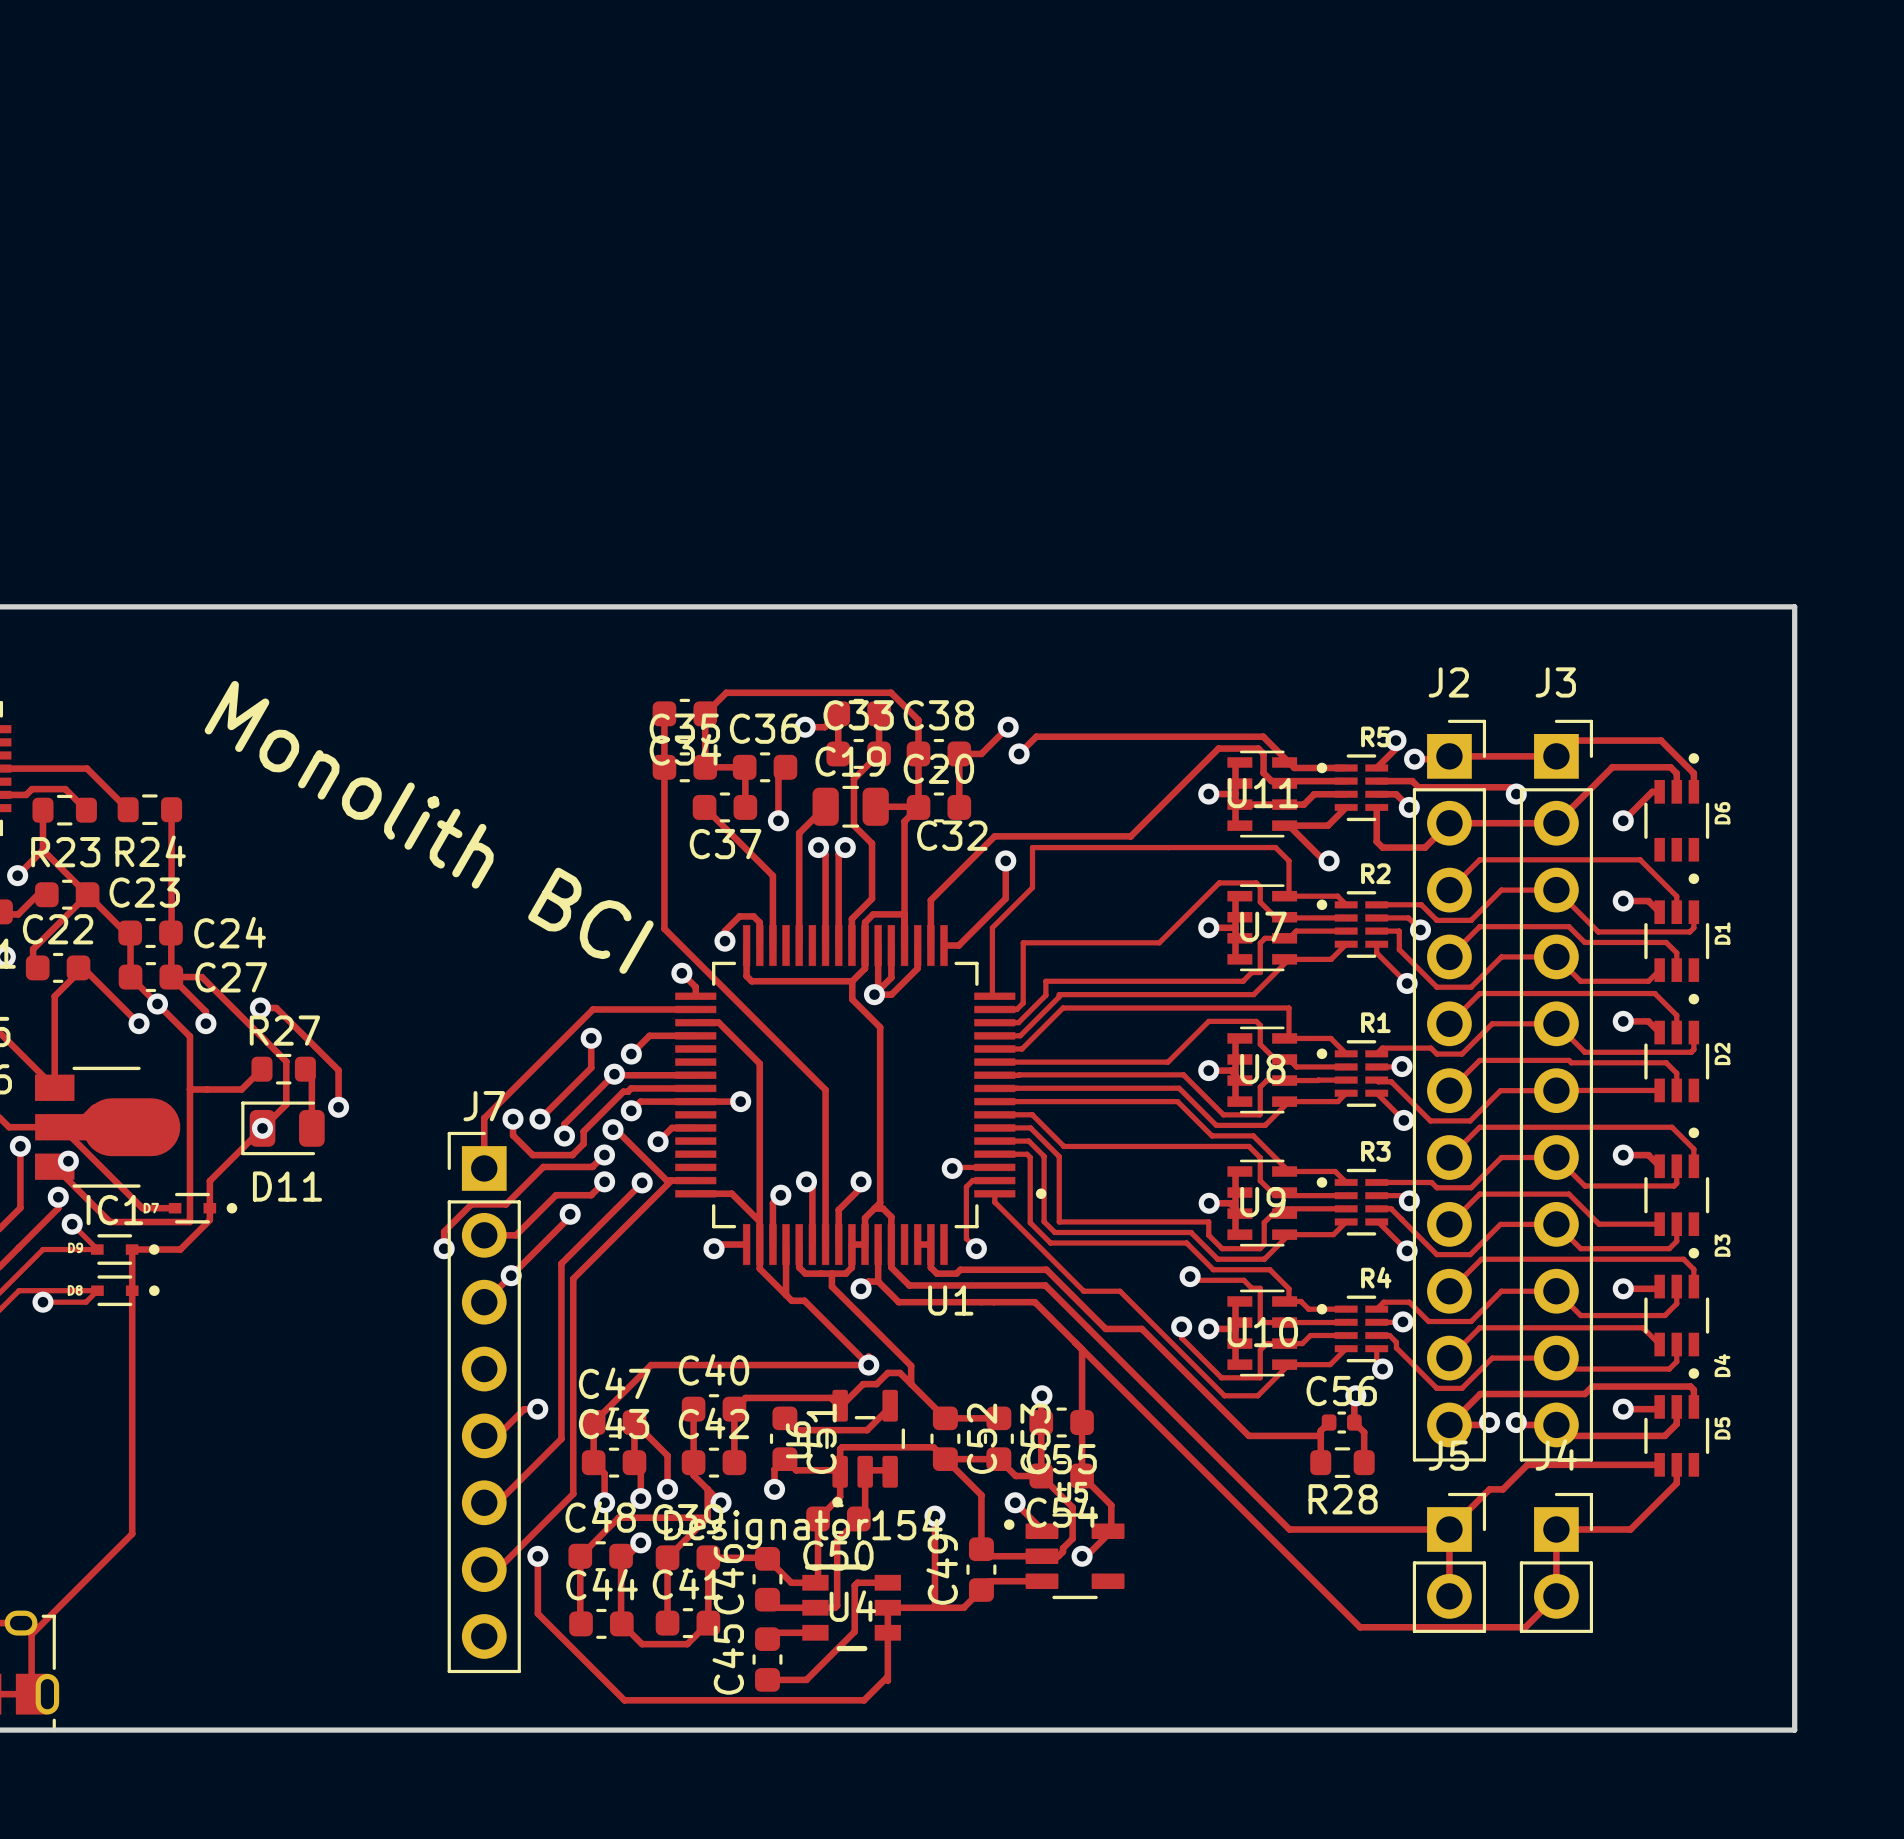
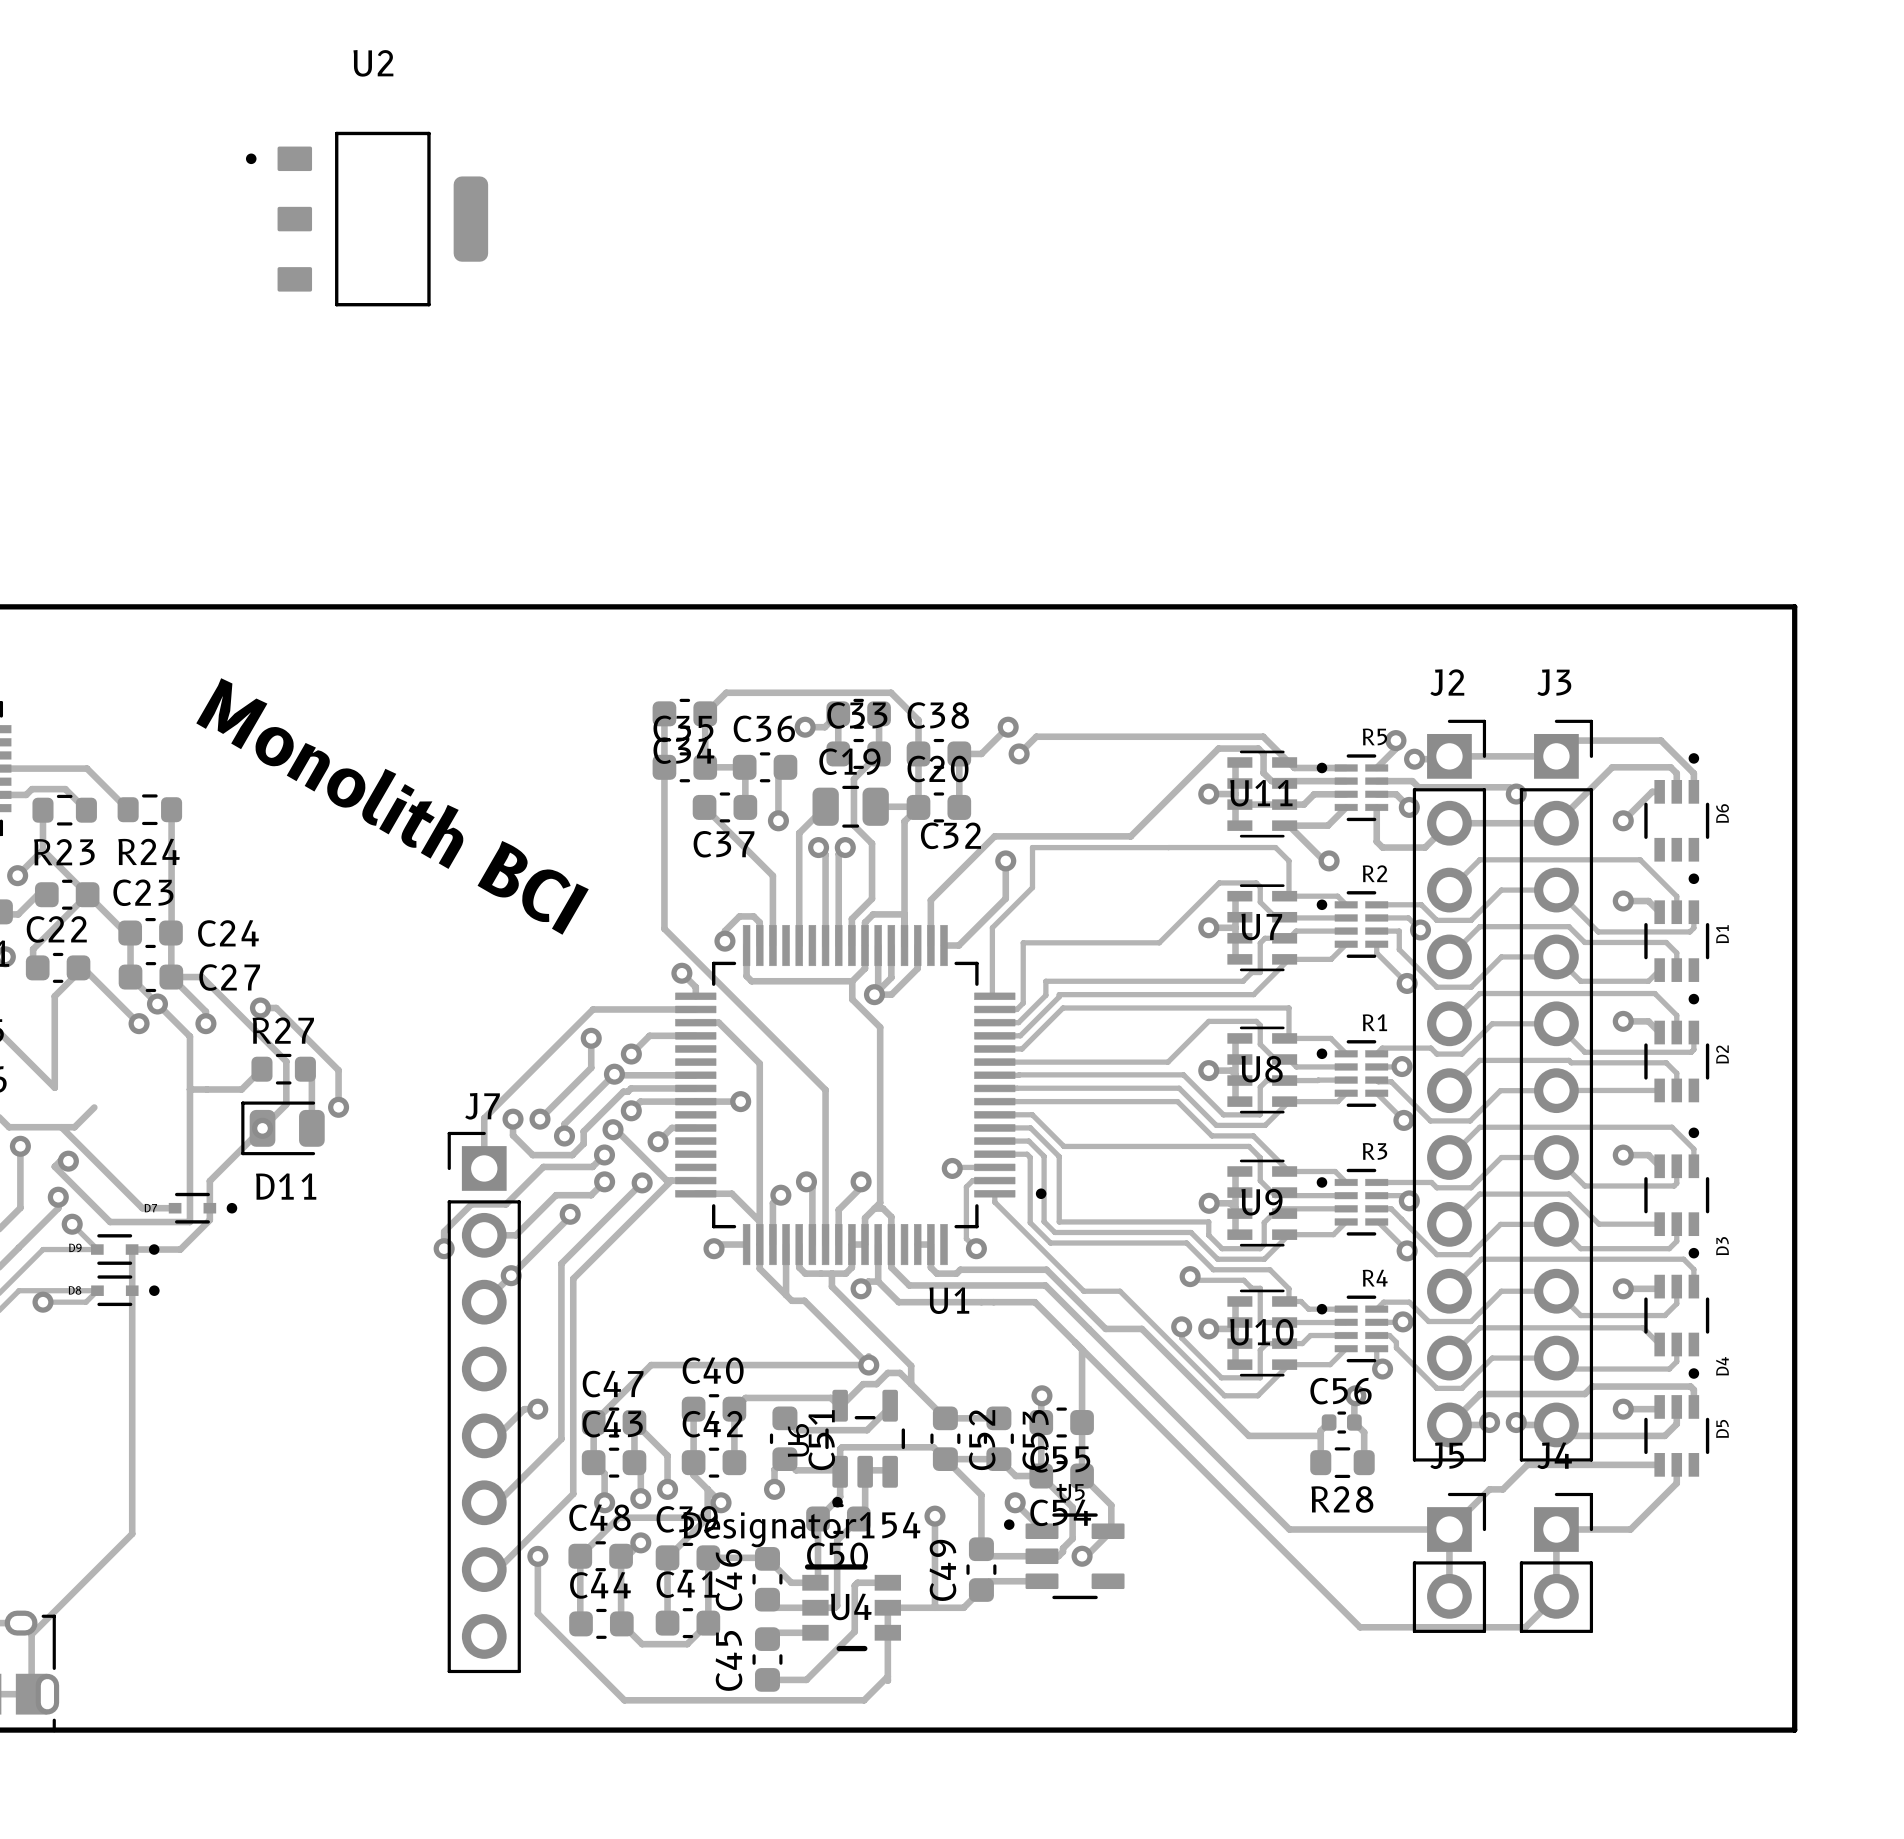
U2: none -> (367, 219)
IC1: (107, 1127) -> none

